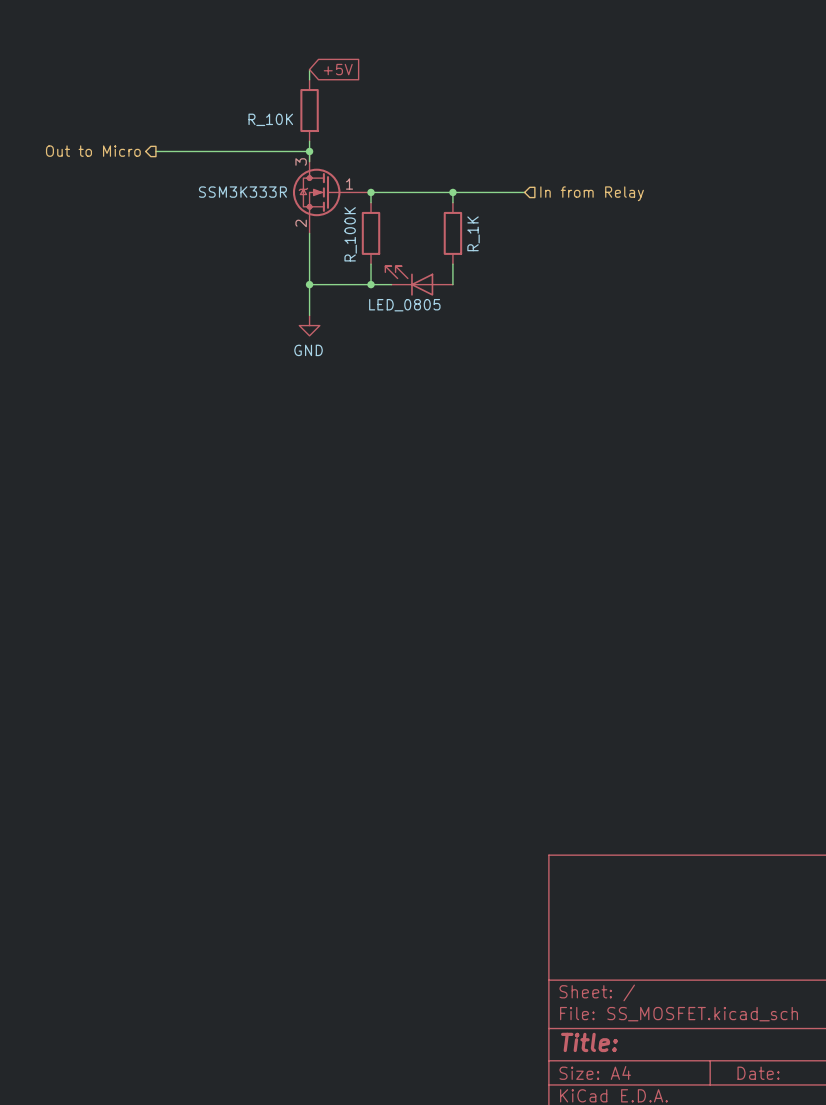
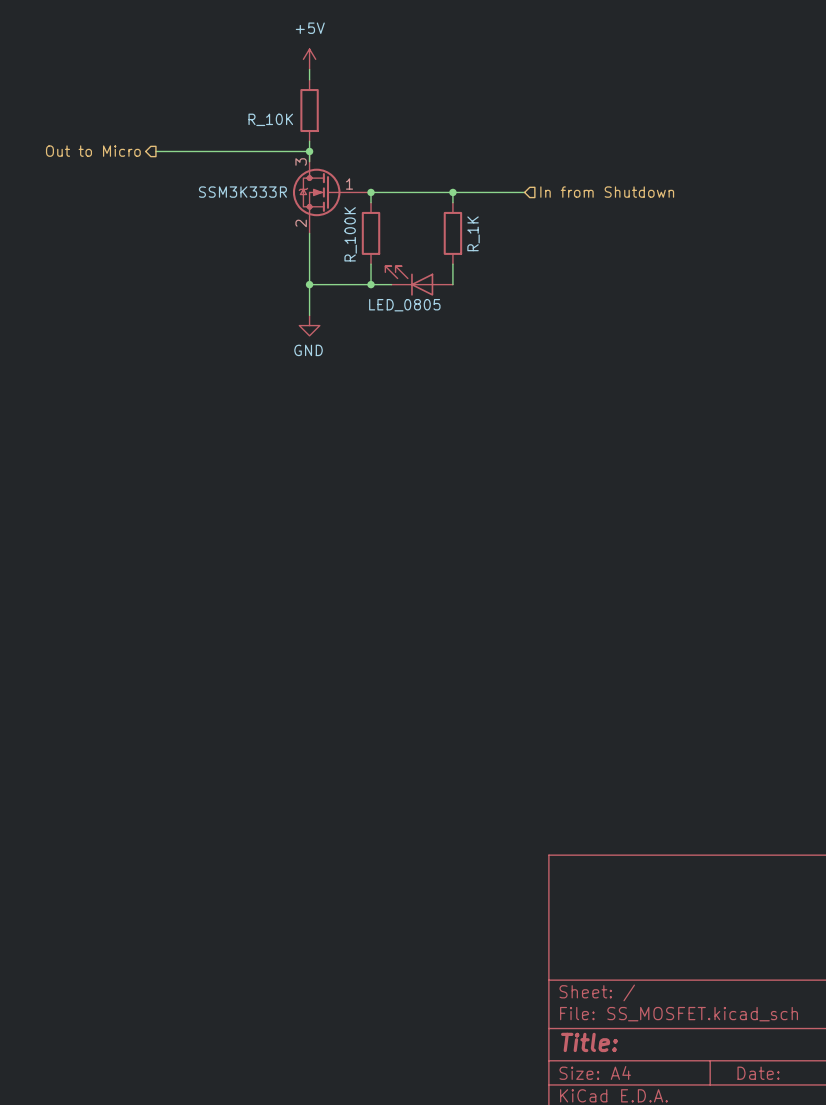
power symbol: none -> +5V (309, 59)
global label: +5V (338, 69) -> none
hierarchical label: In from Relay (592, 193) -> In from Shutdown (607, 192)

